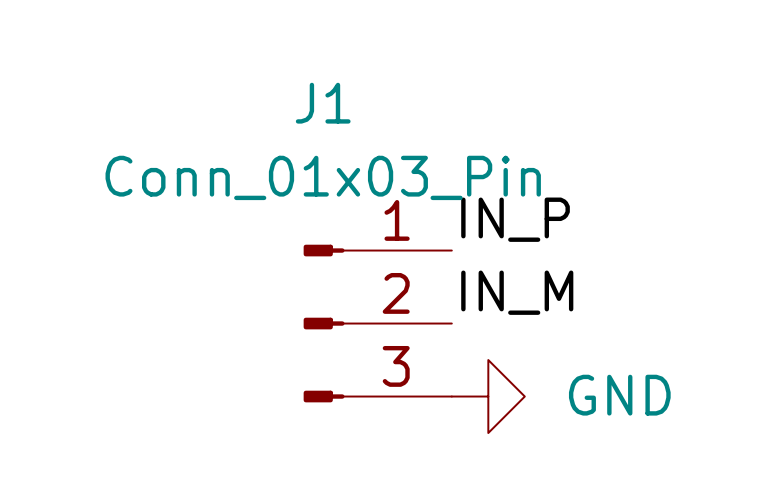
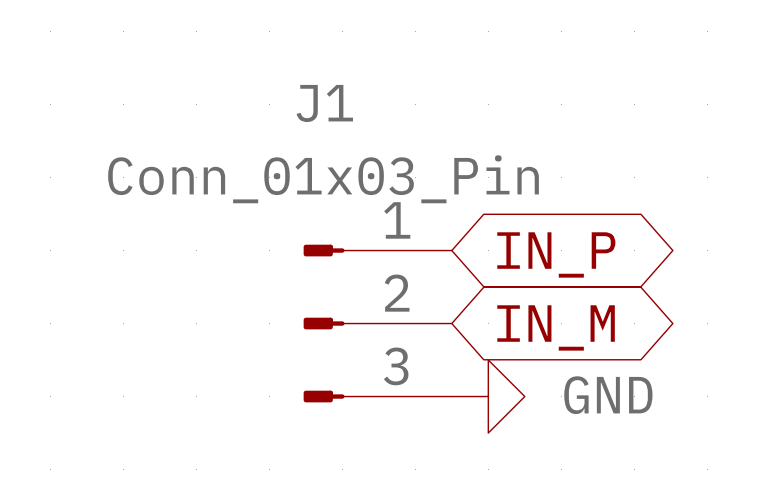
label: IN_P (515, 219) -> none
global label: none -> IN_P (556, 254)
label: IN_M (517, 292) -> none
global label: none -> IN_M (556, 327)

